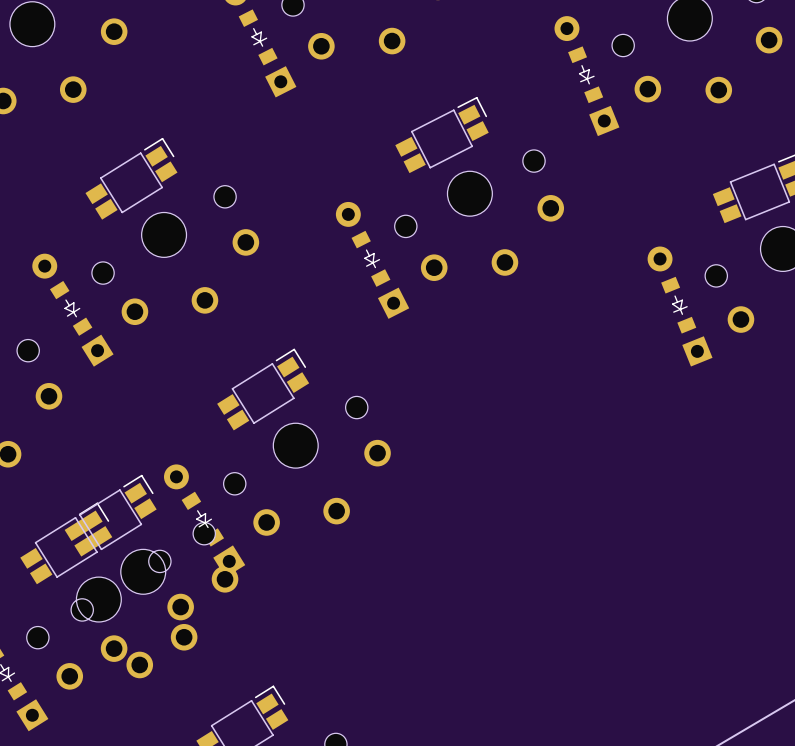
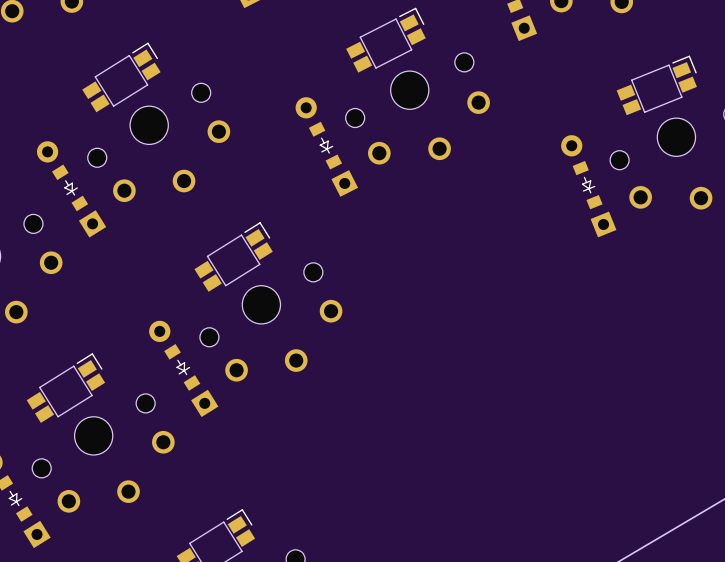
part: (110, 515) -> none
part: (154, 592) -> none

